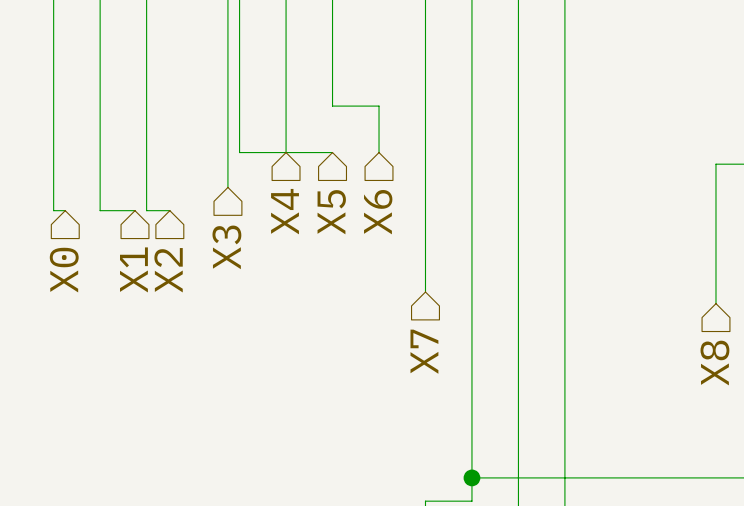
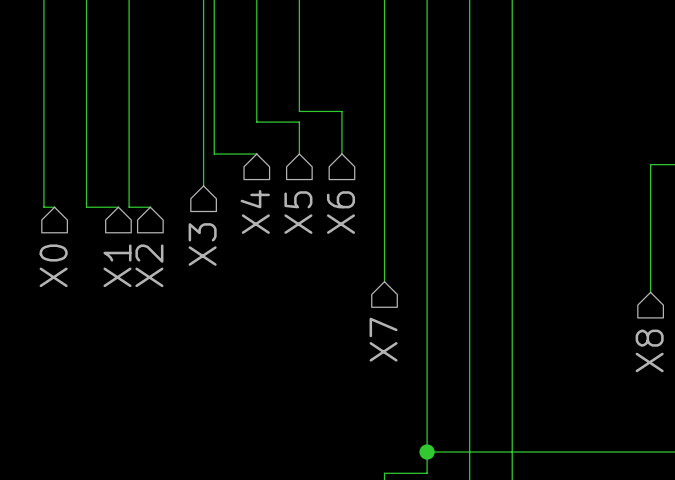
wire: (286, 117) (286, 152) (332, 152) -> (256, 122) (299, 122) (299, 154)

